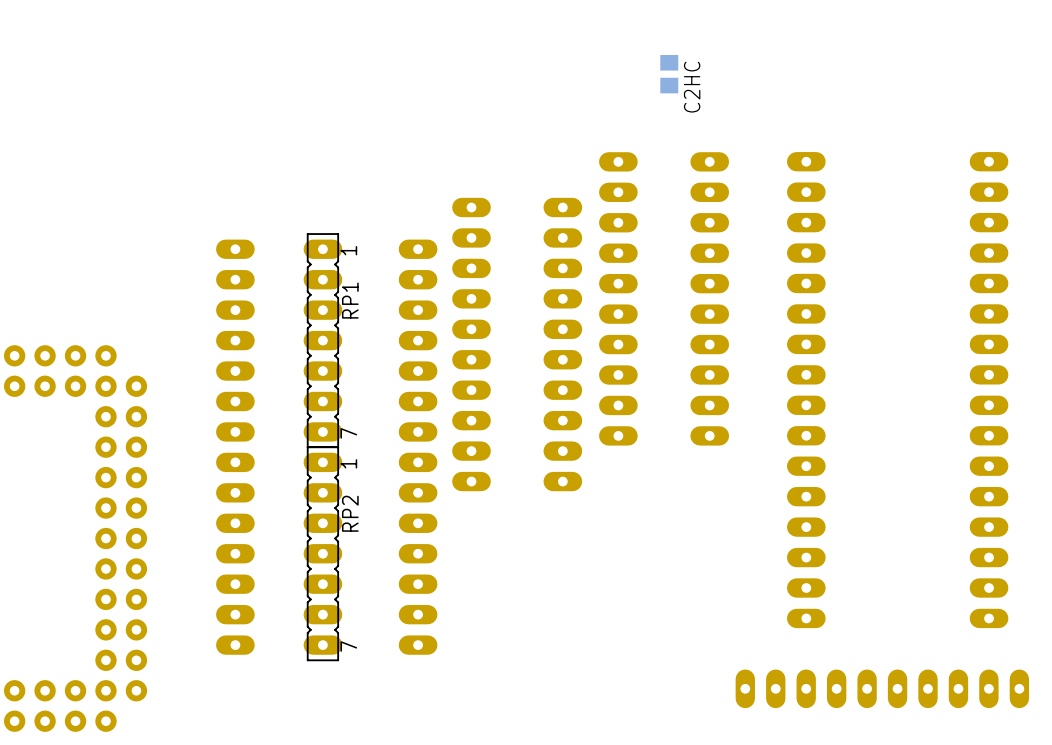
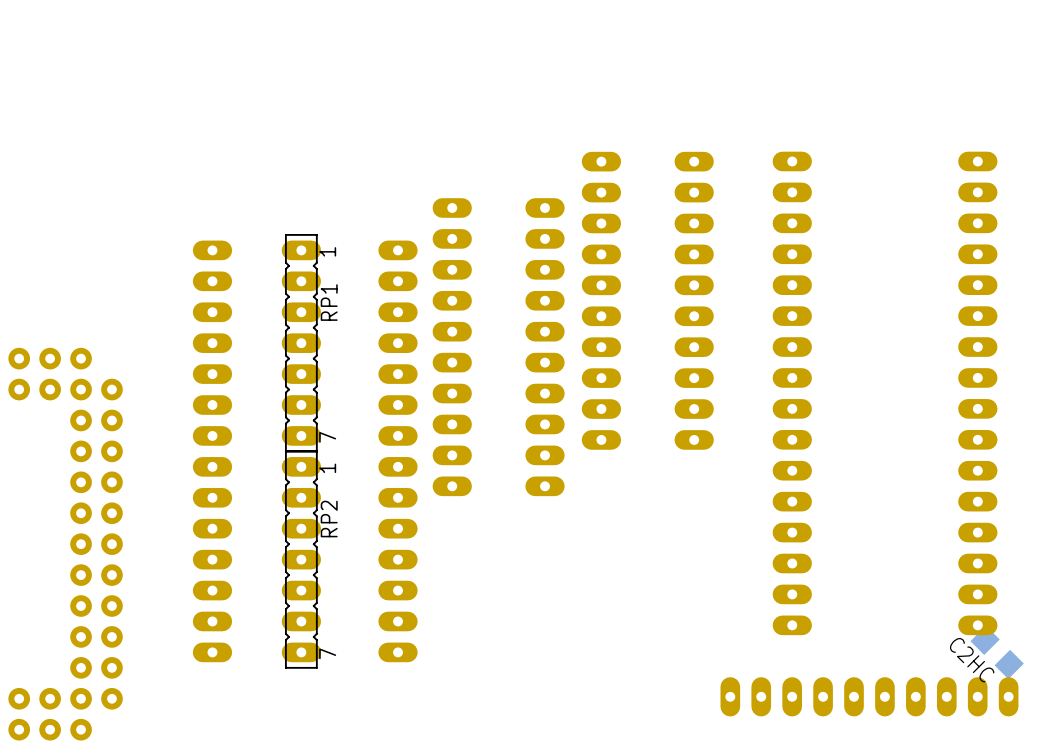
C2HC footprint: [660, 54, 679, 94] -> [970, 625, 1024, 680]
C2HC name position: C2HC (692, 87) -> C2HC (972, 660)

